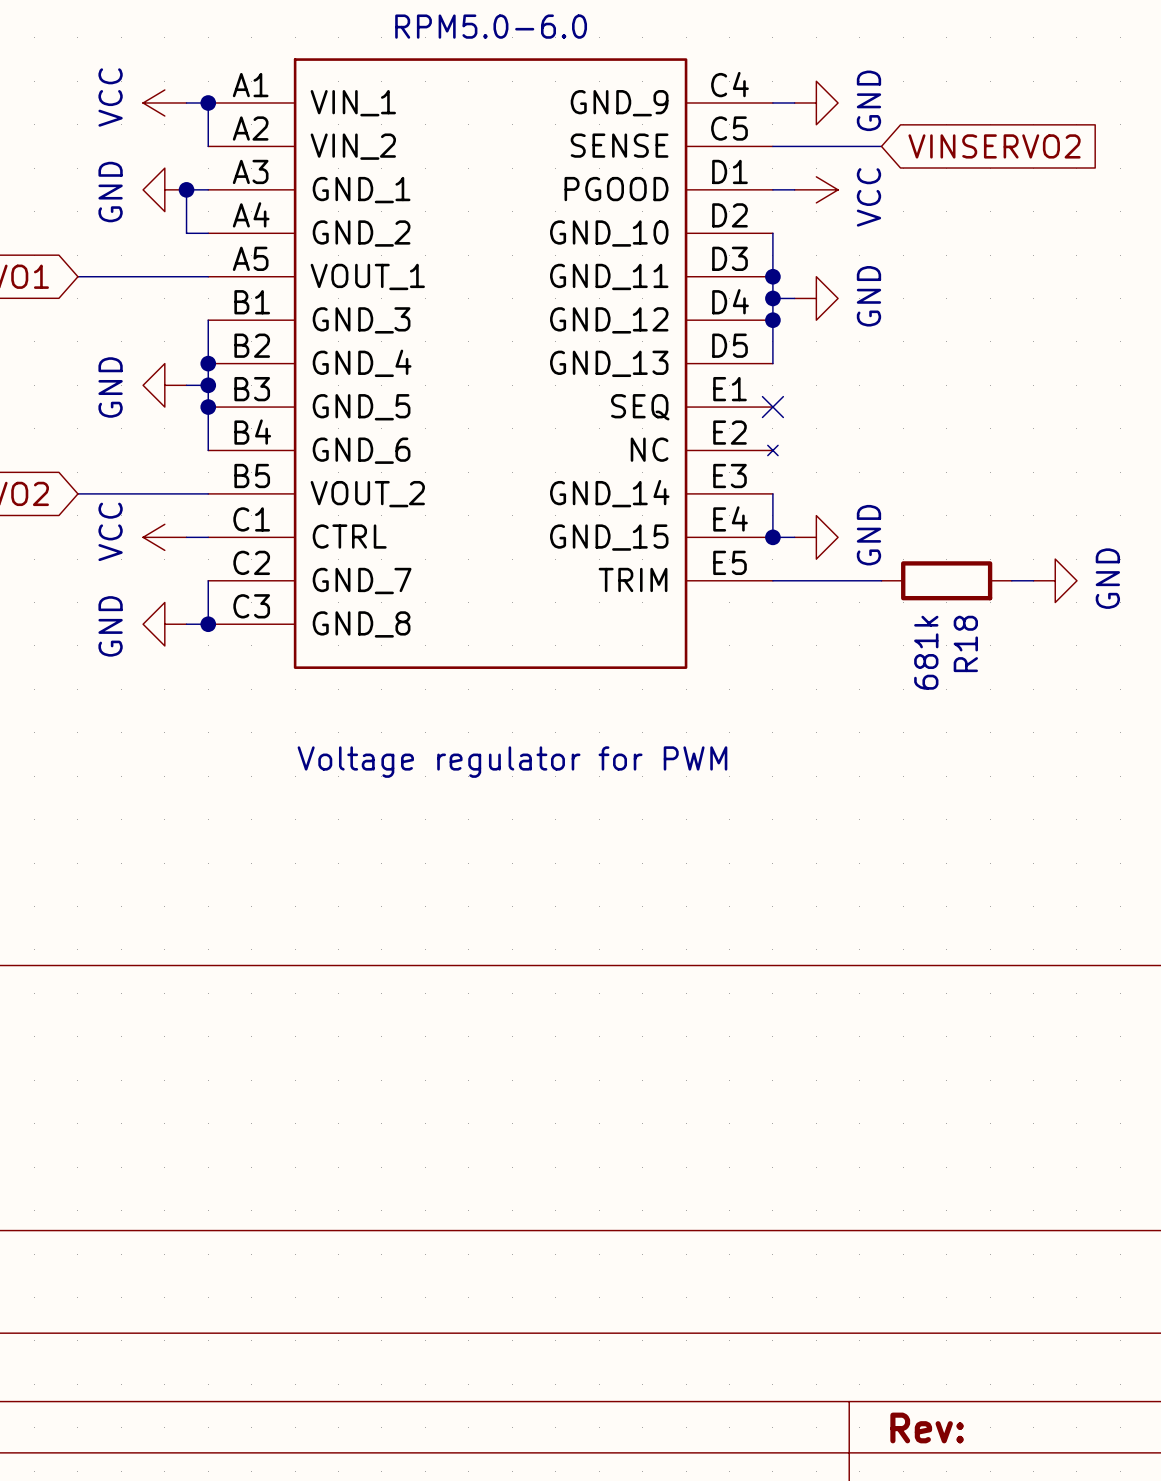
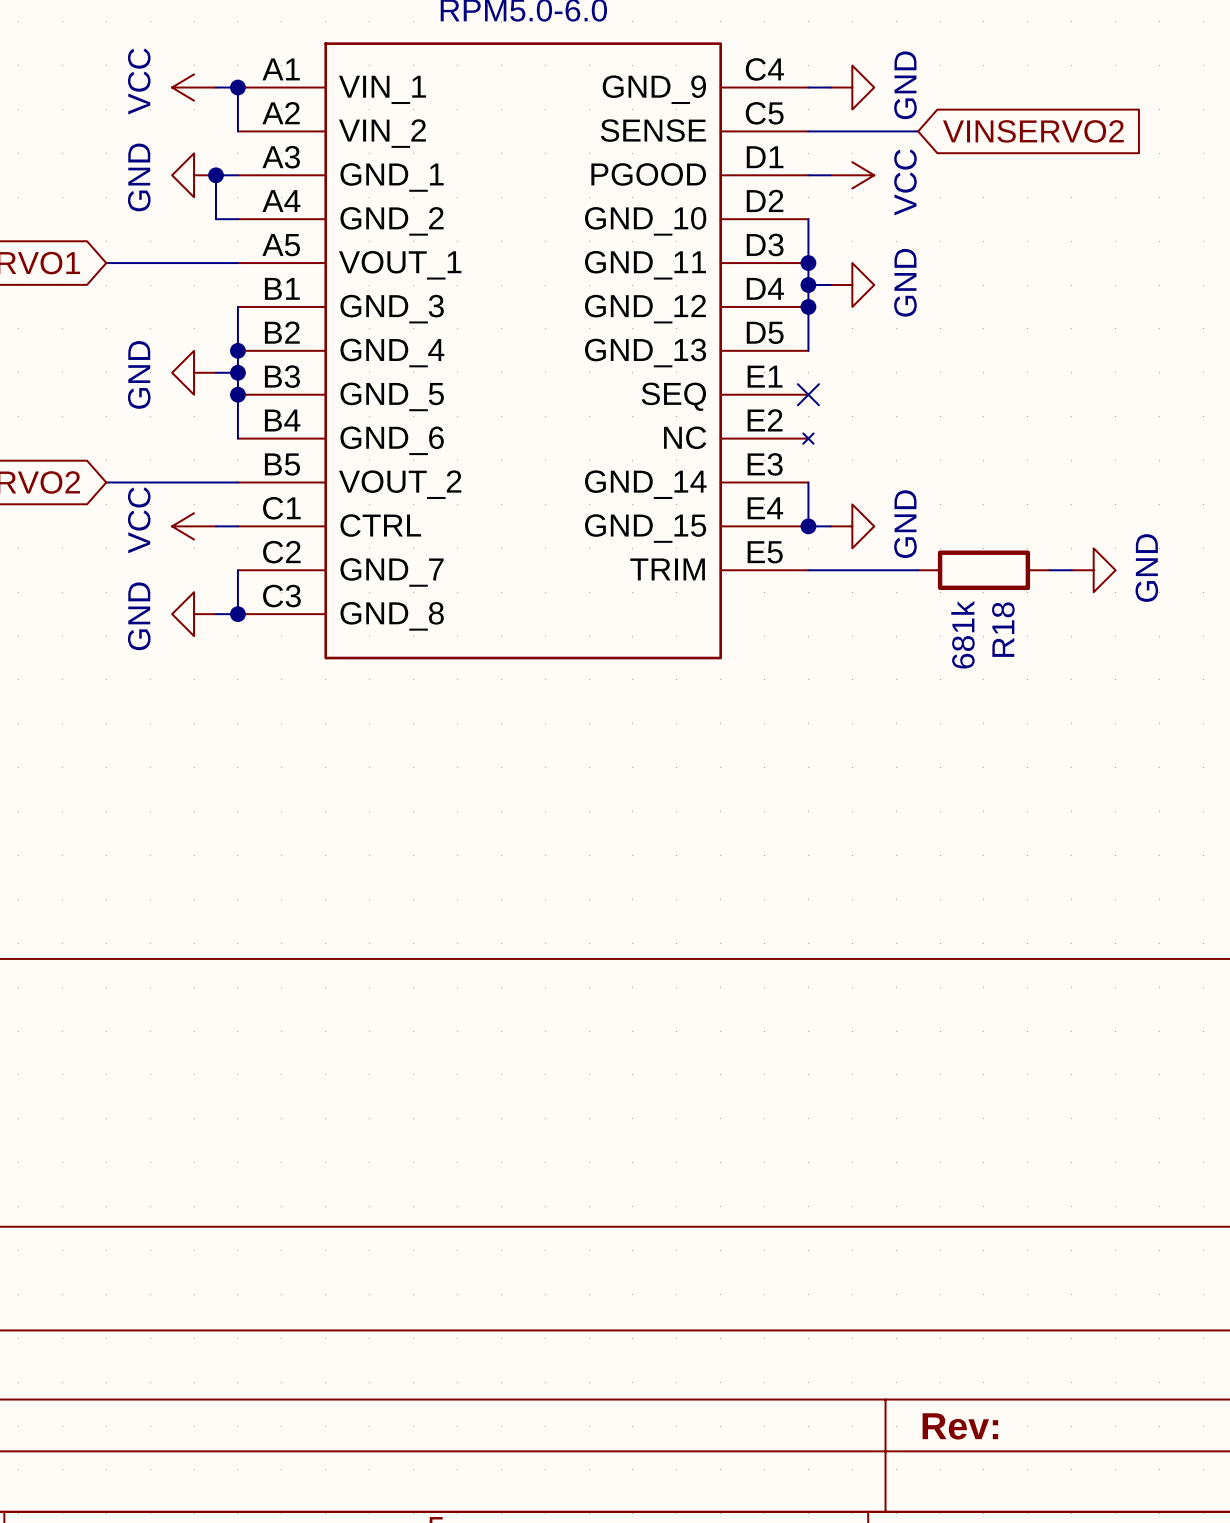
text: Voltage regulator for PWM (512, 762) -> none

